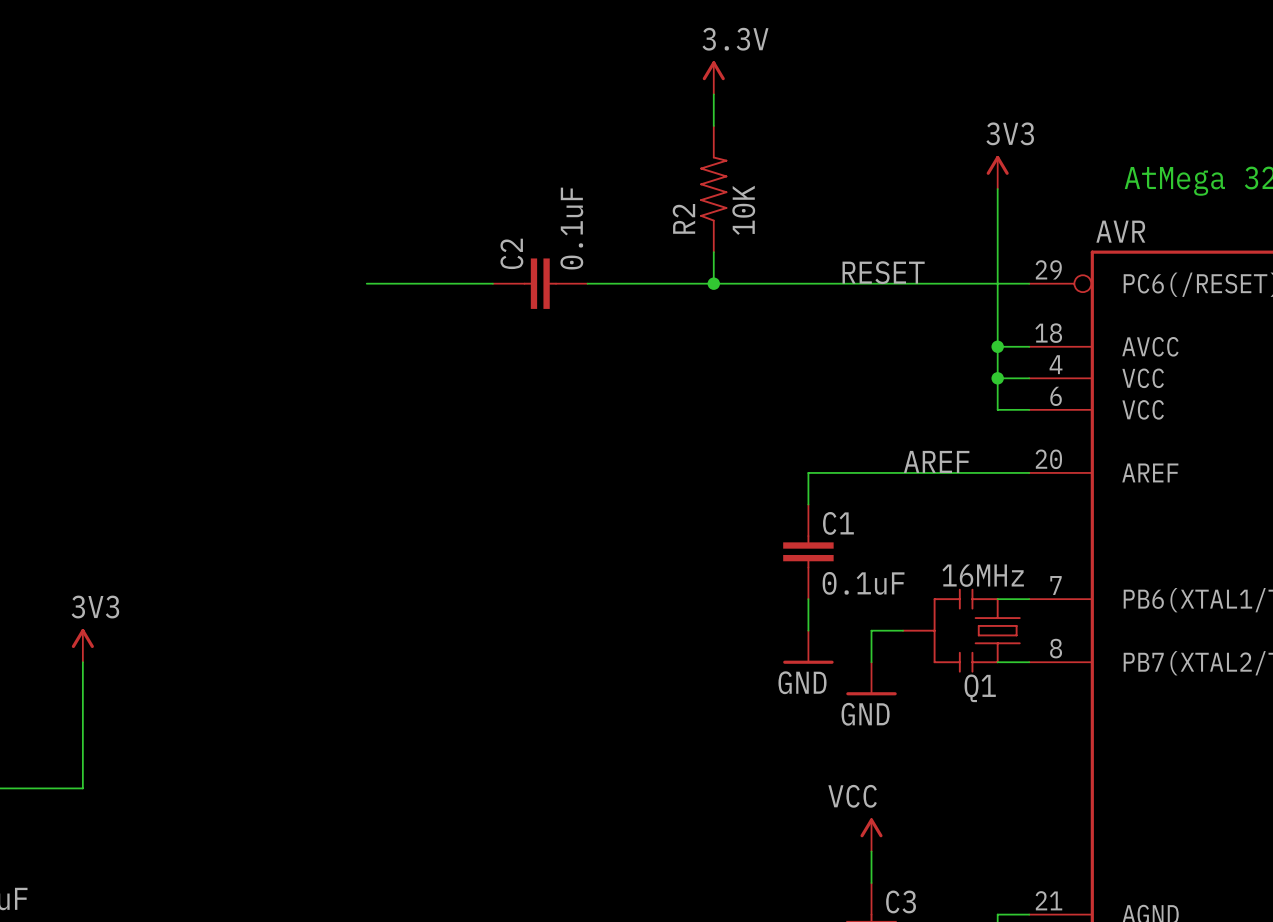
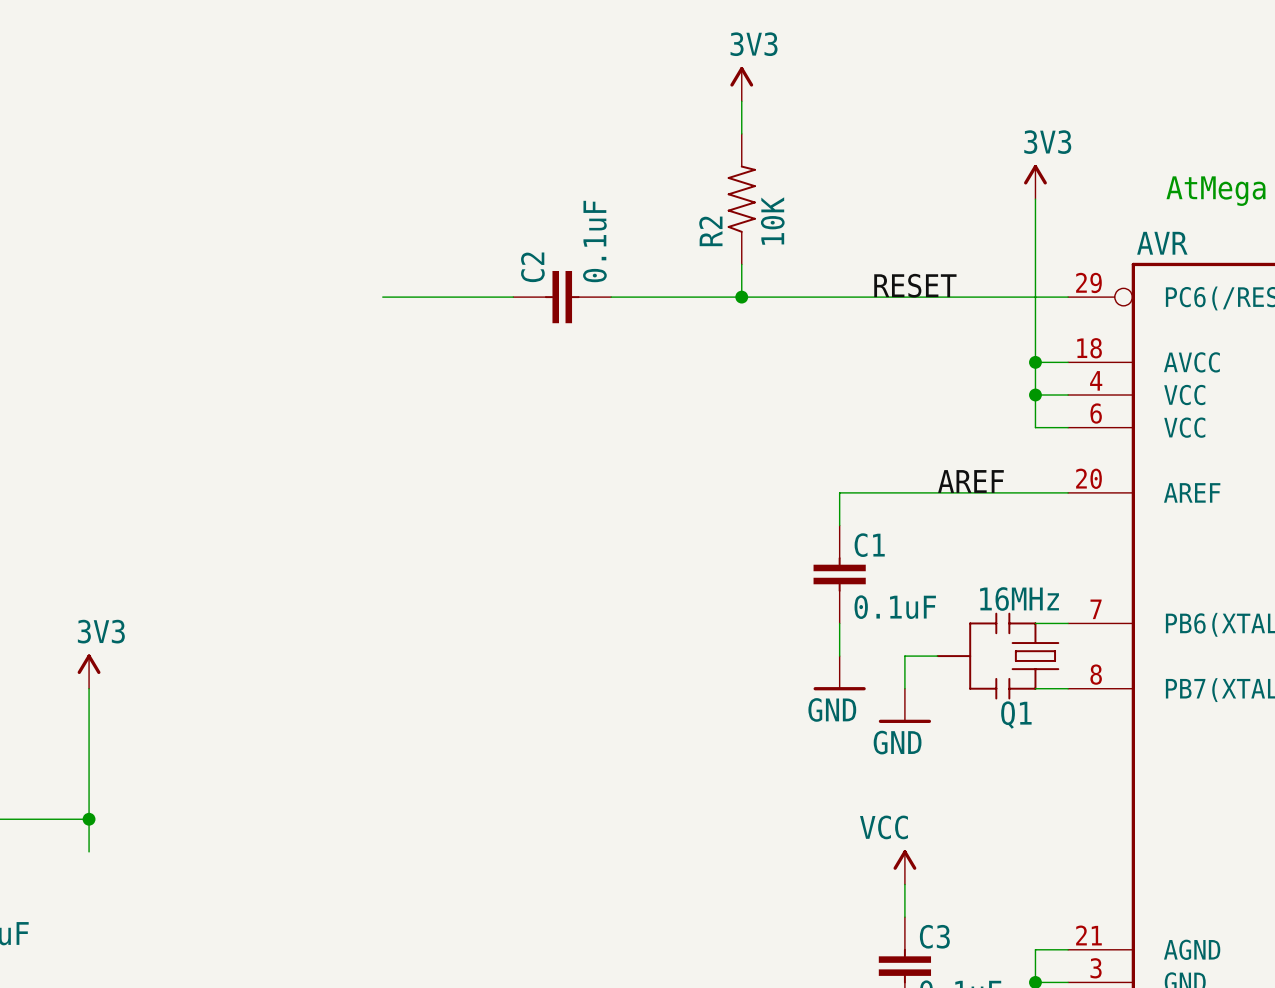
power symbol: 3.3V (713, 77) -> 3V3 (741, 84)
wire: none -> (89, 819) (89, 851)
junction: none -> (89, 819)

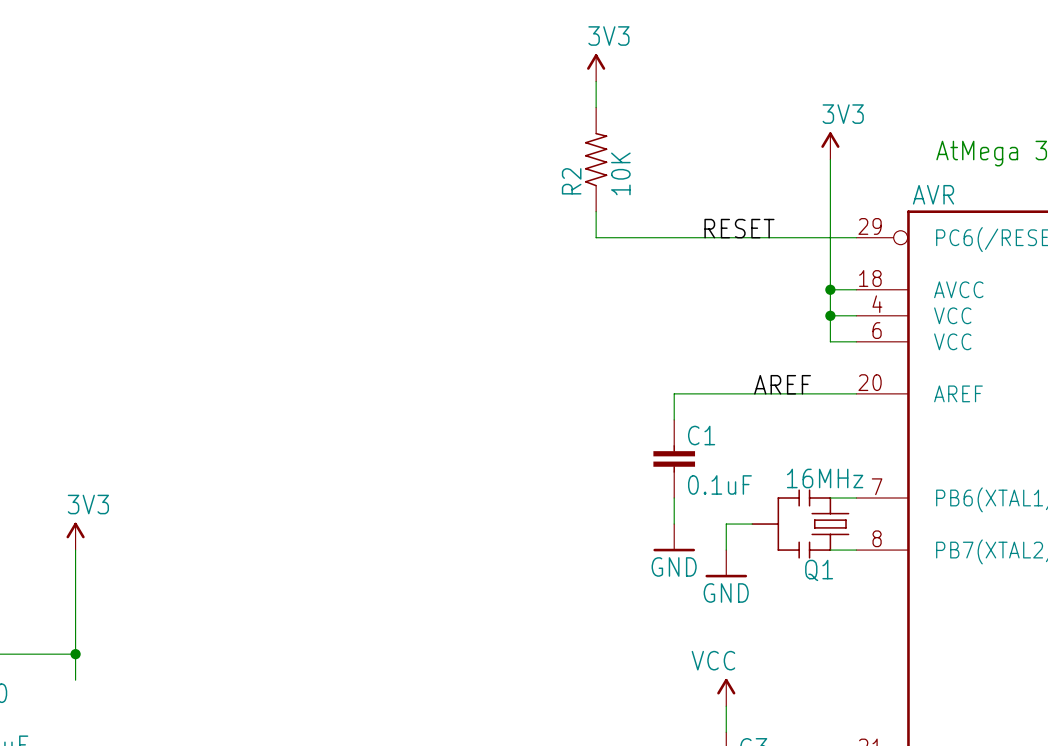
wire: (382, 297) (513, 297) -> none
C2: 0.1uF (562, 297) -> none
wire: (611, 297) (741, 297) -> none
junction: (741, 297) -> none

